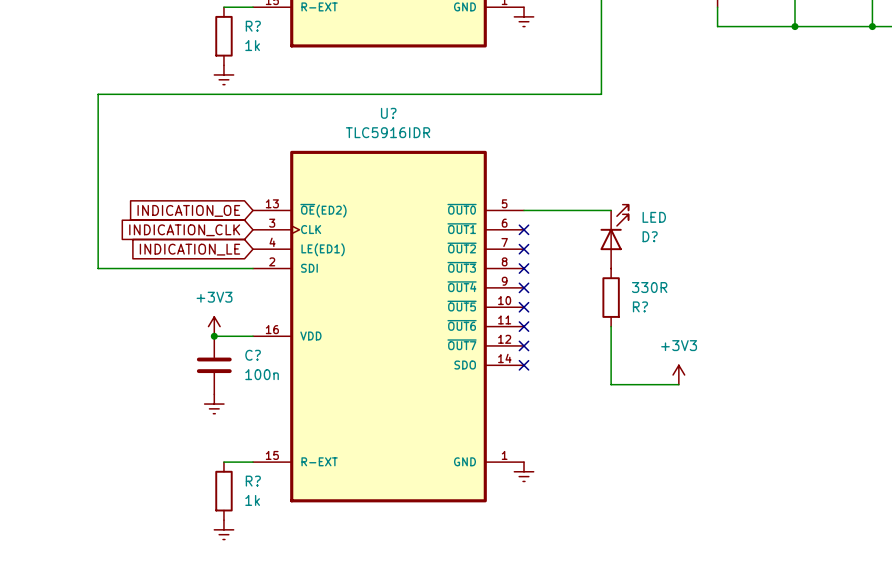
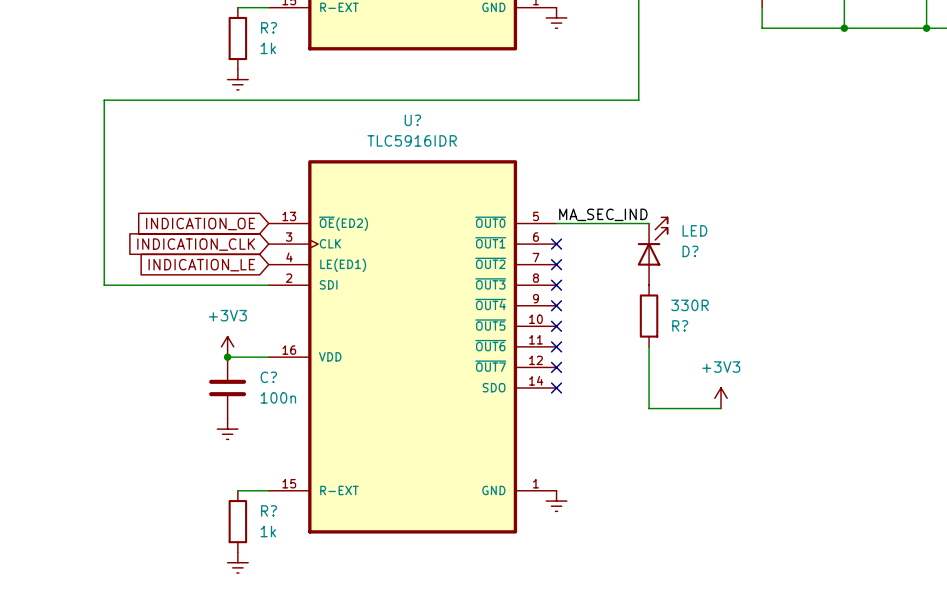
label: none -> MA_SEC_IND (603, 214)

